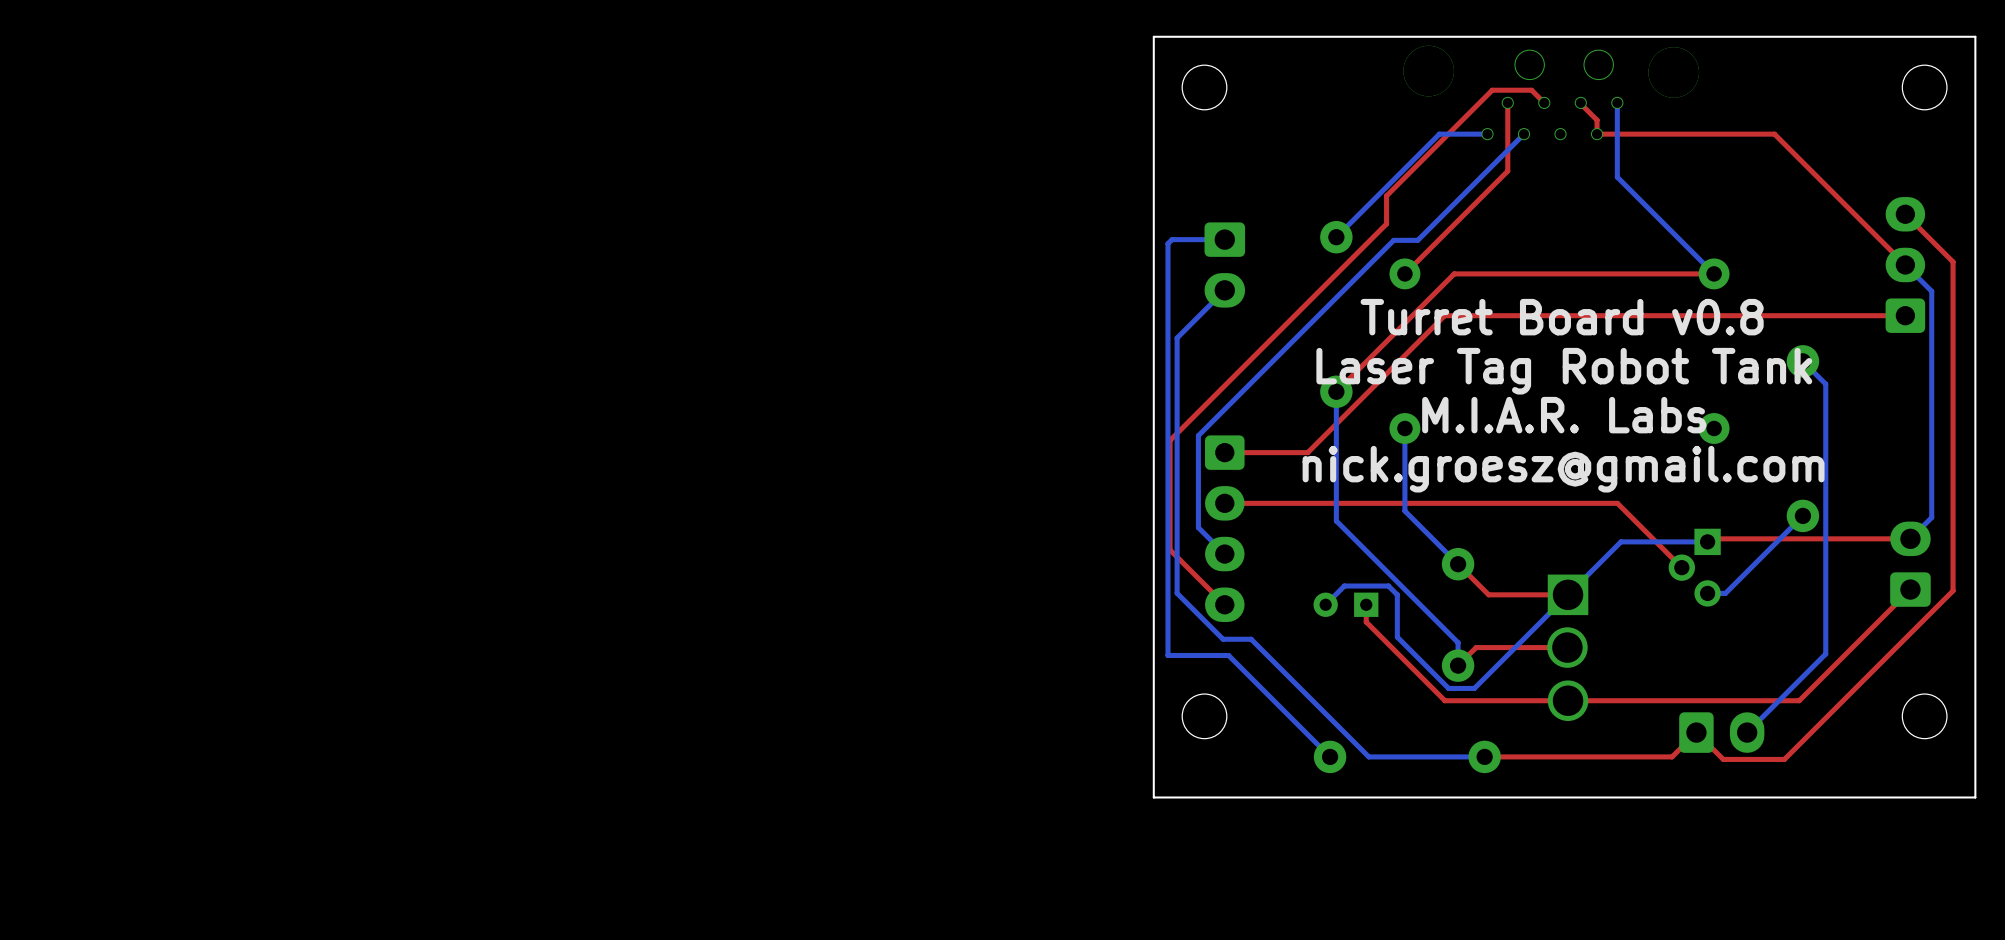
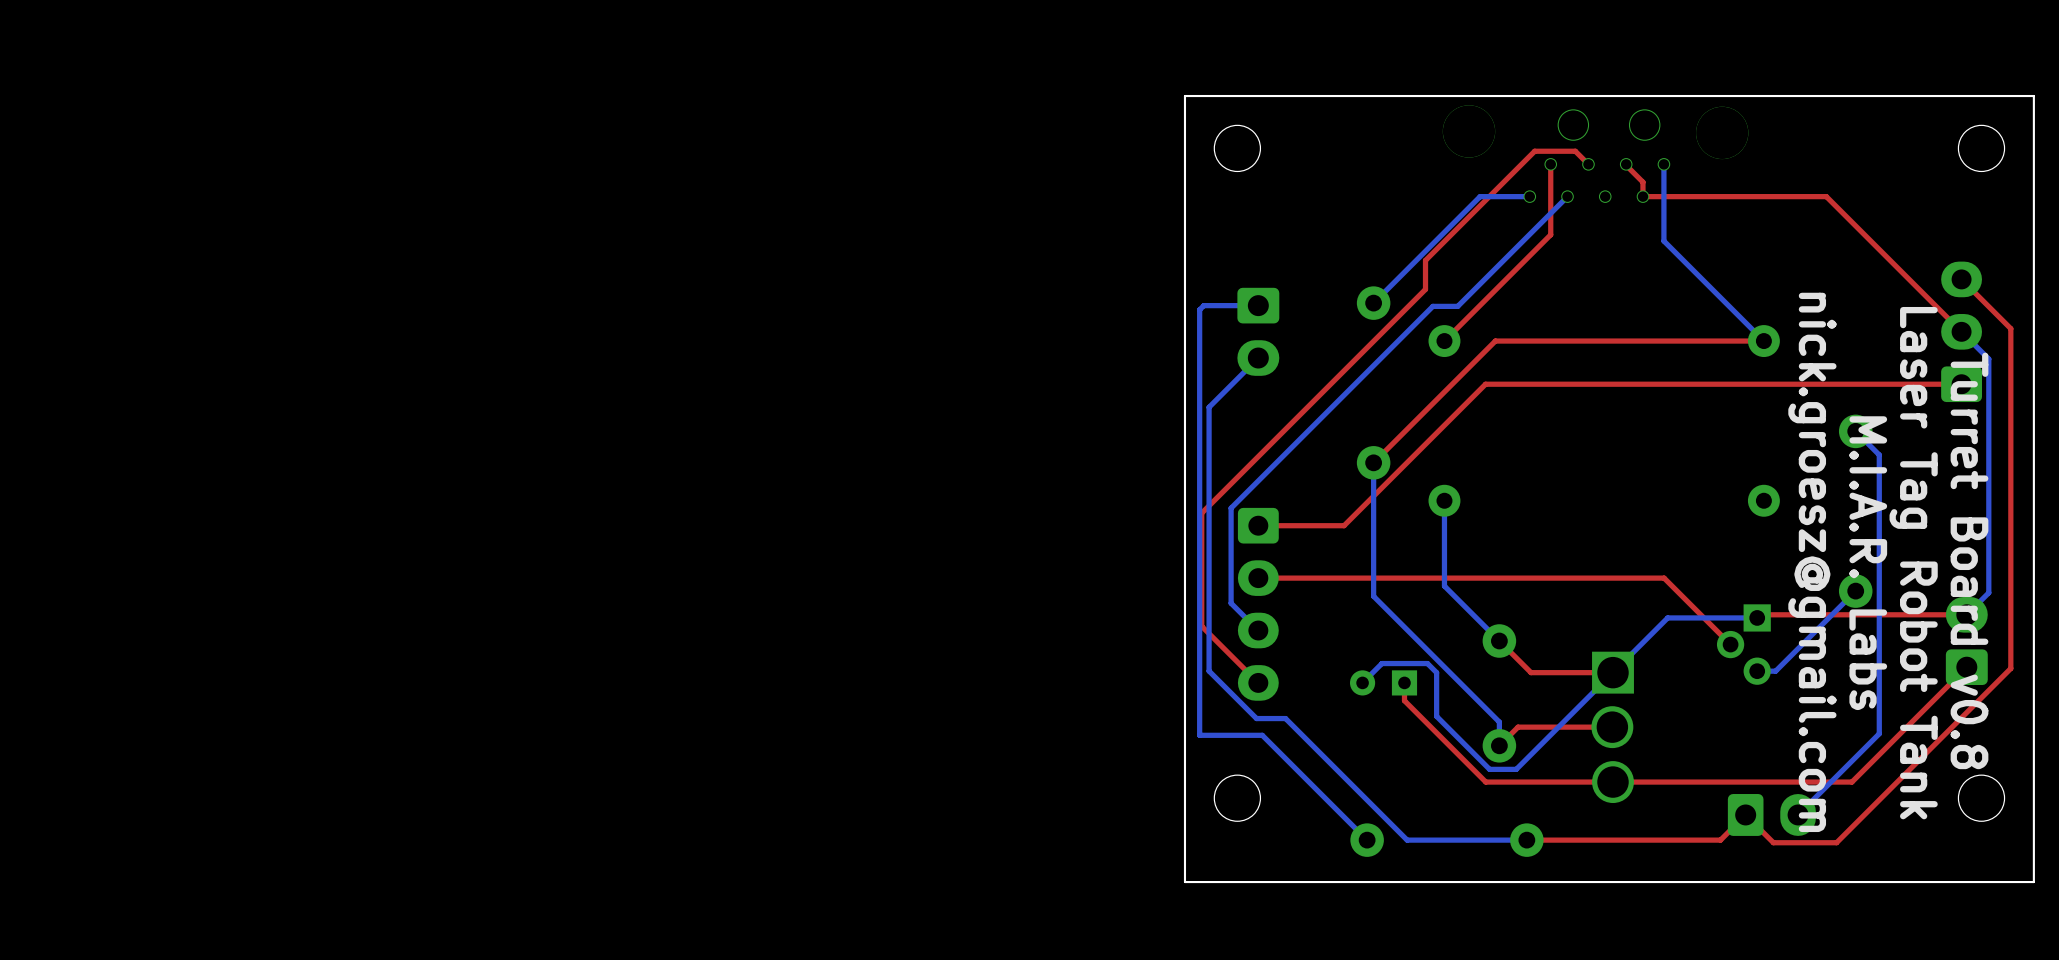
text rotation: 0° (1562, 317) -> 90° clockwise (1969, 560)
text rotation: 0° (1564, 371) -> 90° clockwise (1913, 563)
text rotation: 0° (1564, 415) -> 90° clockwise (1868, 563)
text rotation: 0° (1563, 469) -> 90° clockwise (1812, 562)

